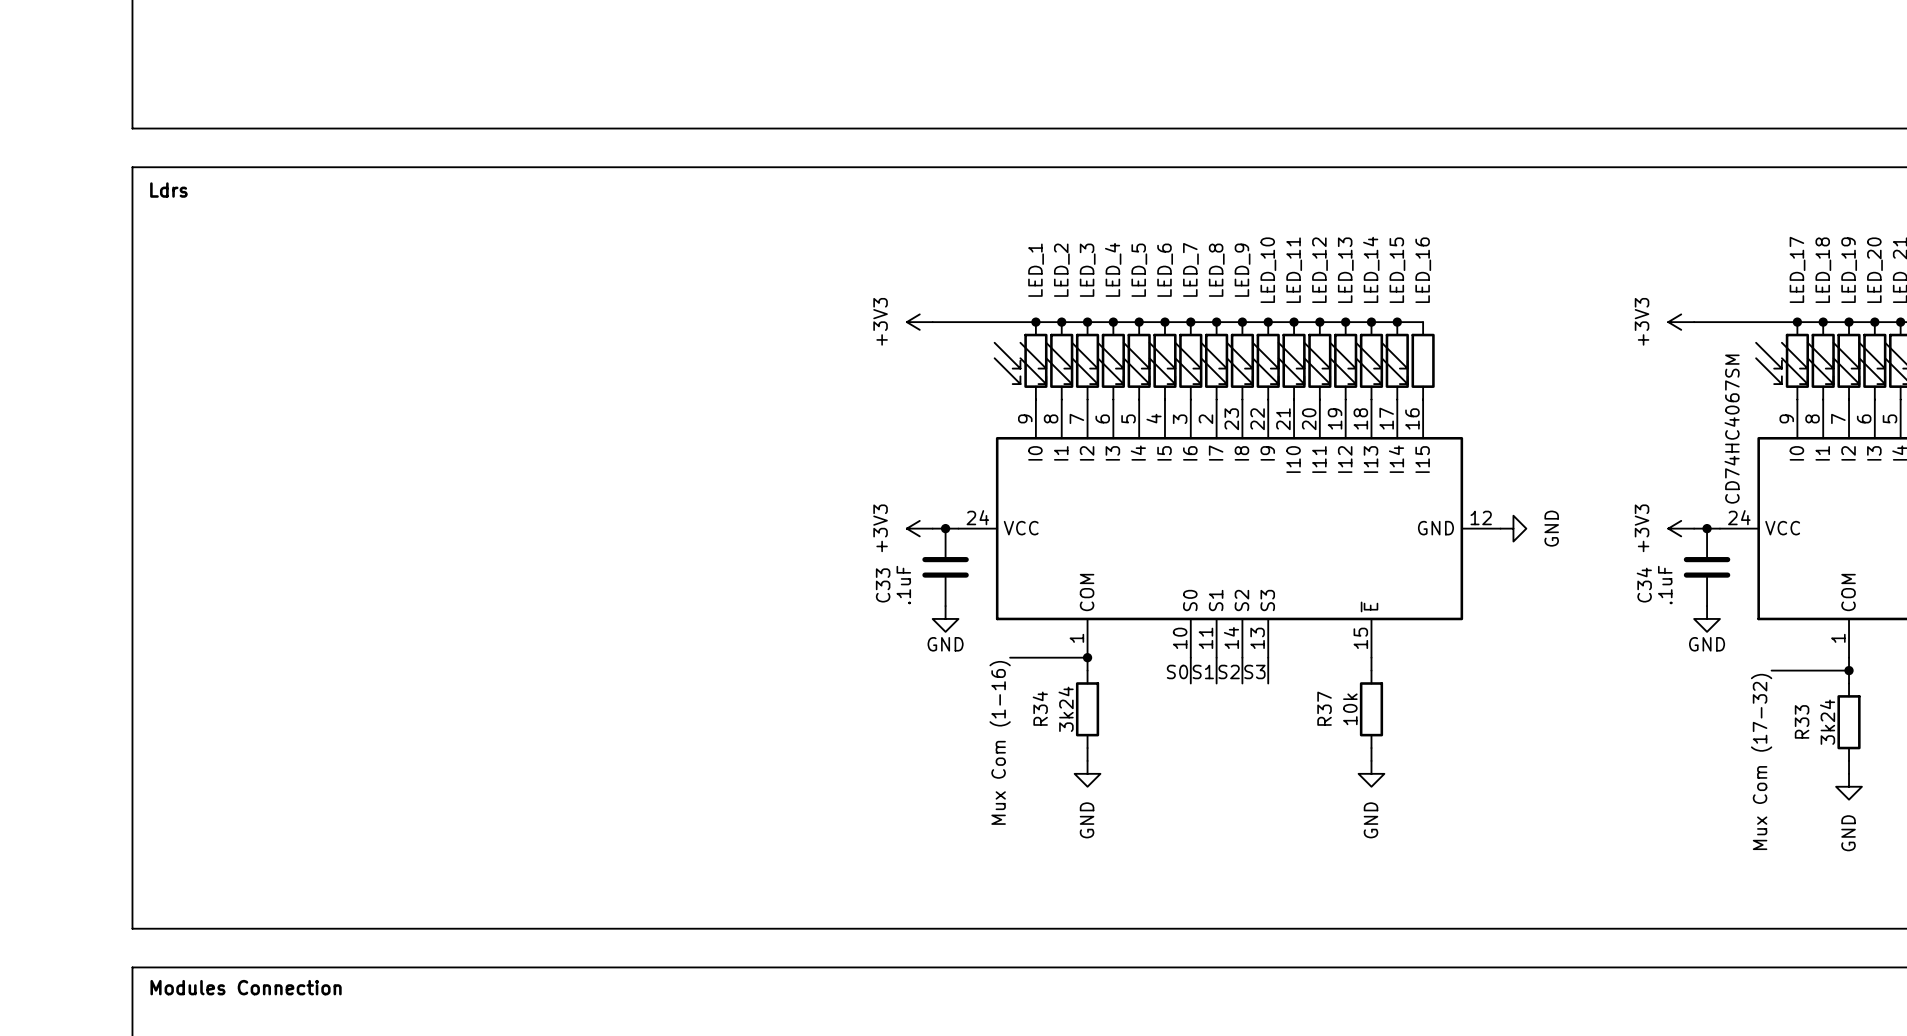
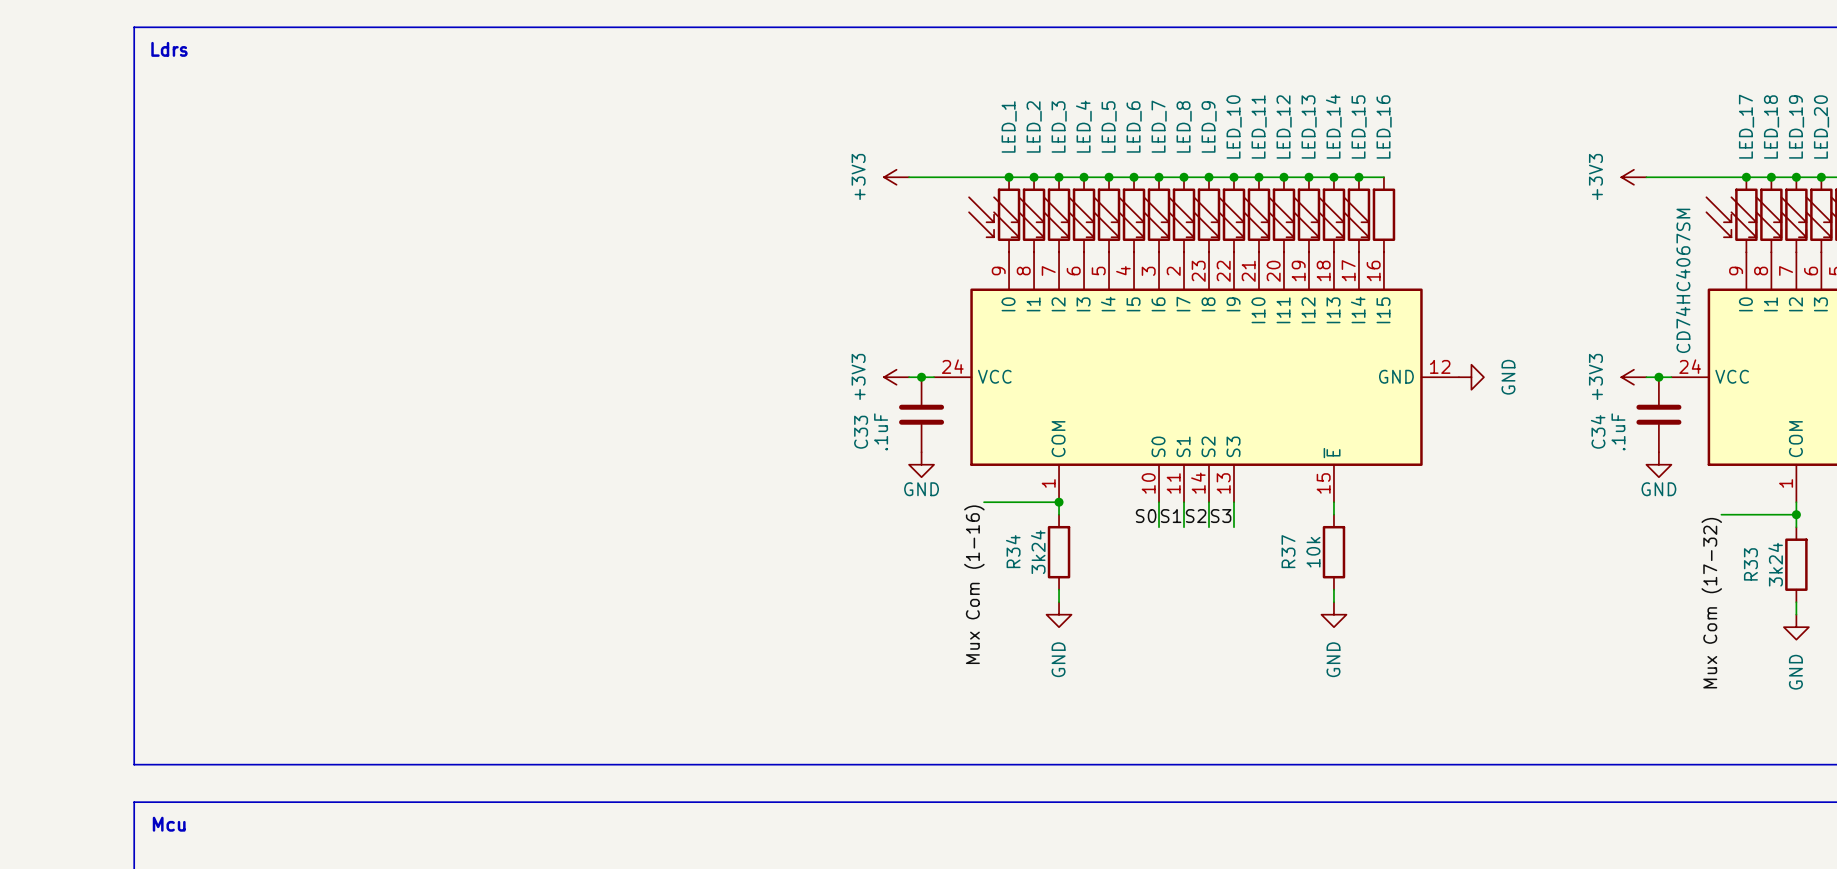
text: Modules Connection (246, 987) -> none
text: none -> Mcu (169, 824)

